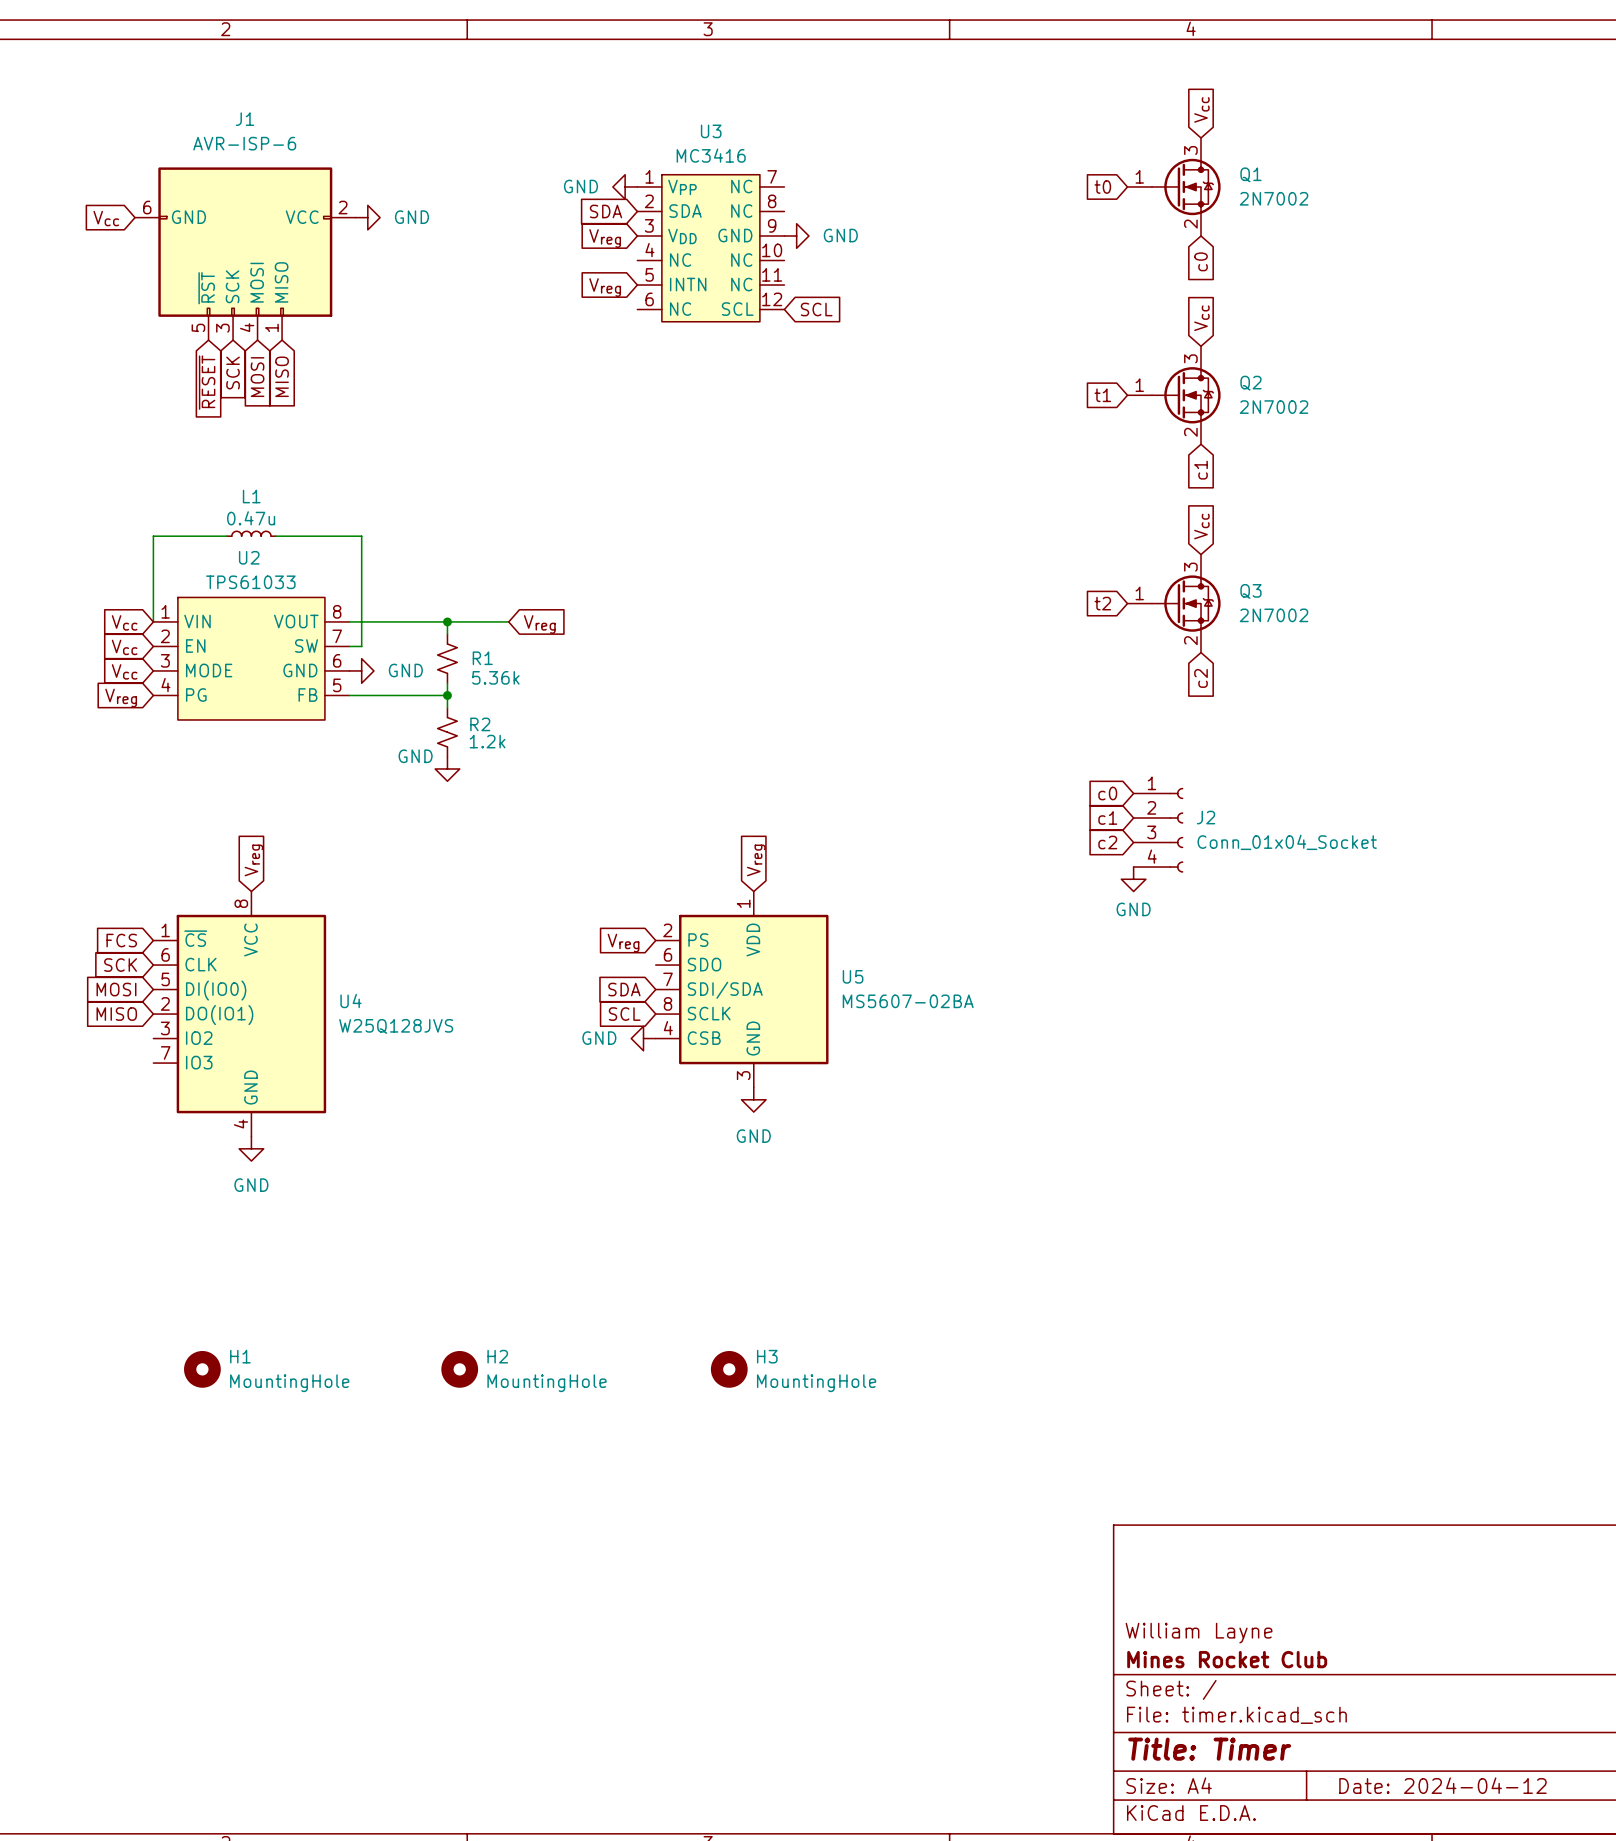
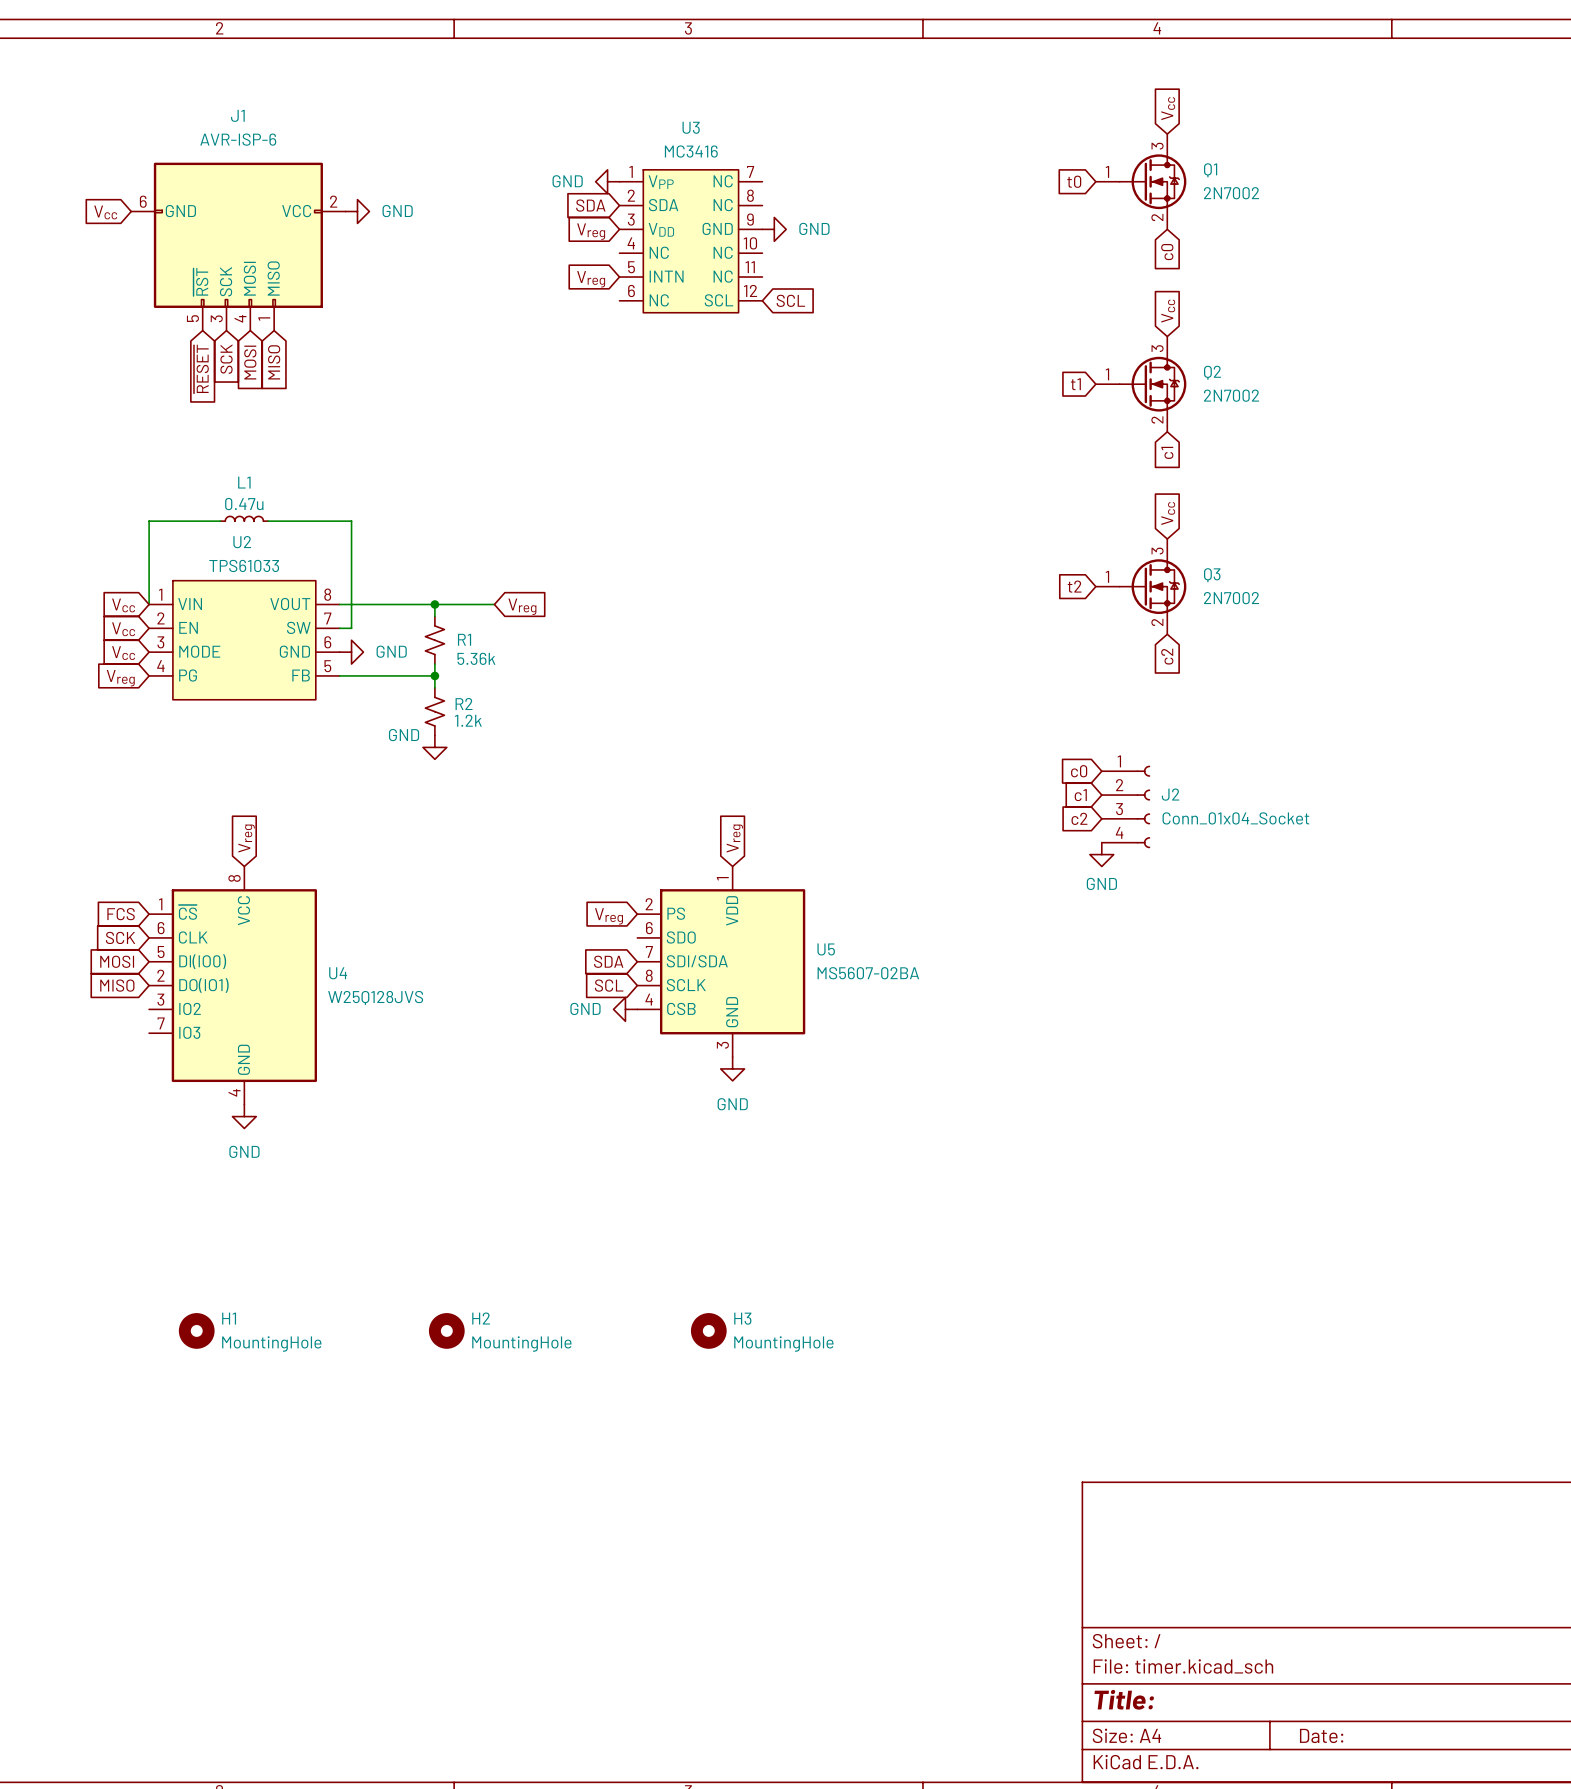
title block: William Layne (1199, 1633) -> none
title block: Mines Rocket Club (1227, 1659) -> none
title block: Title: Timer (1209, 1749) -> Title: (1124, 1699)
title block: Date: 2024-04-12 (1442, 1785) -> Date: (1321, 1735)

